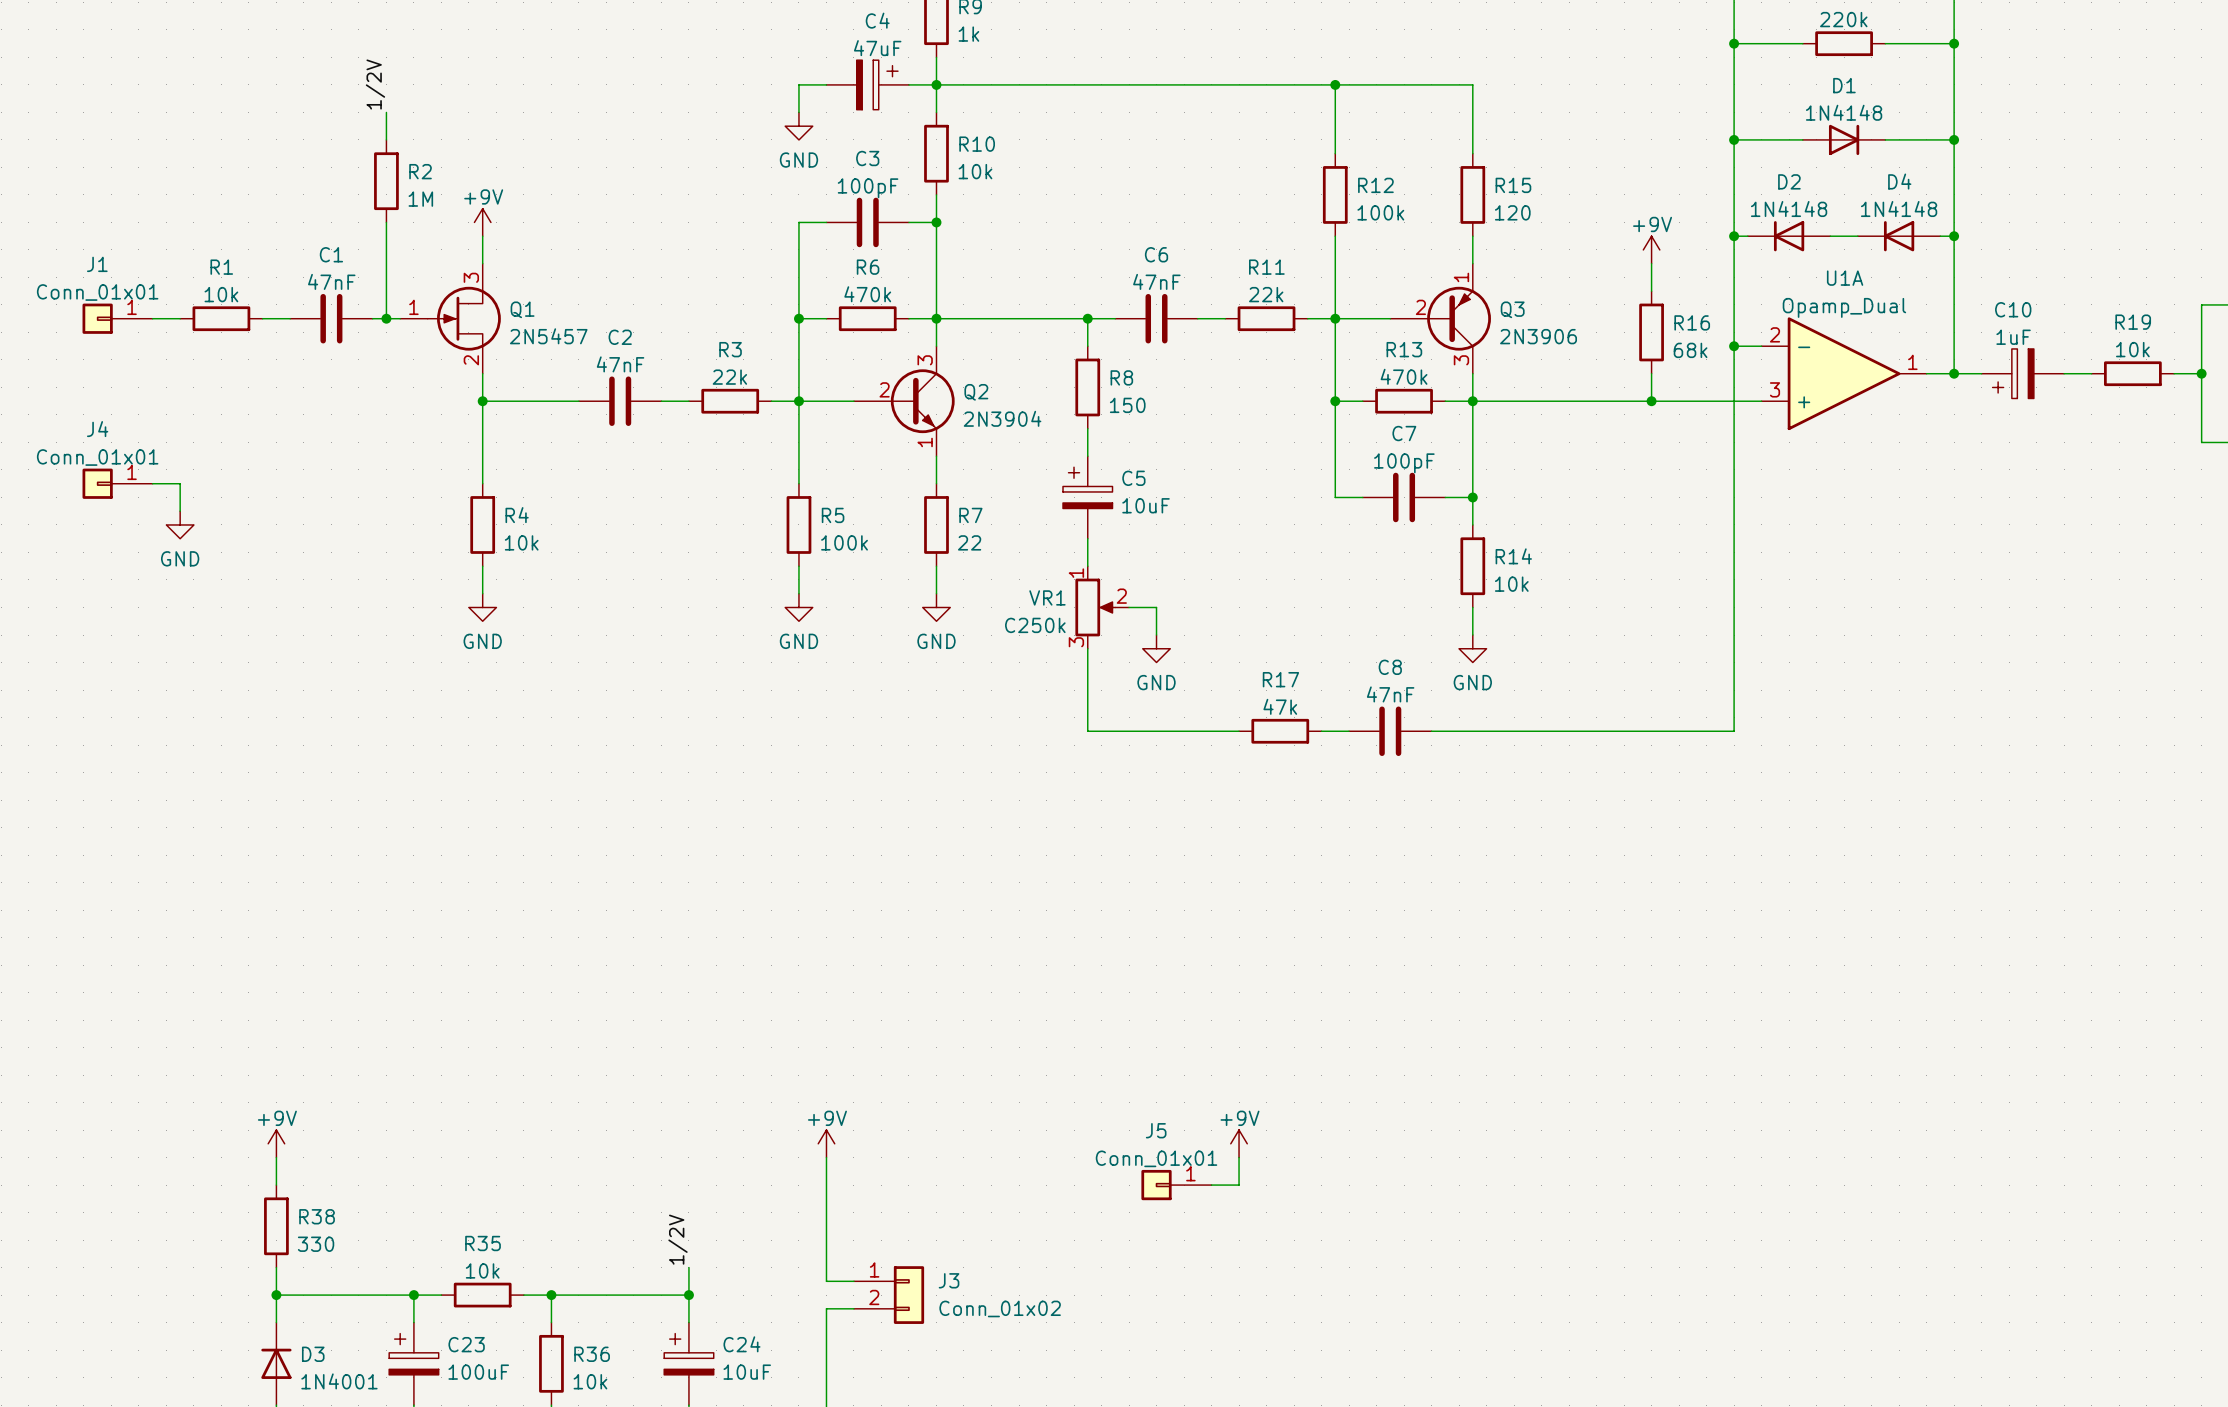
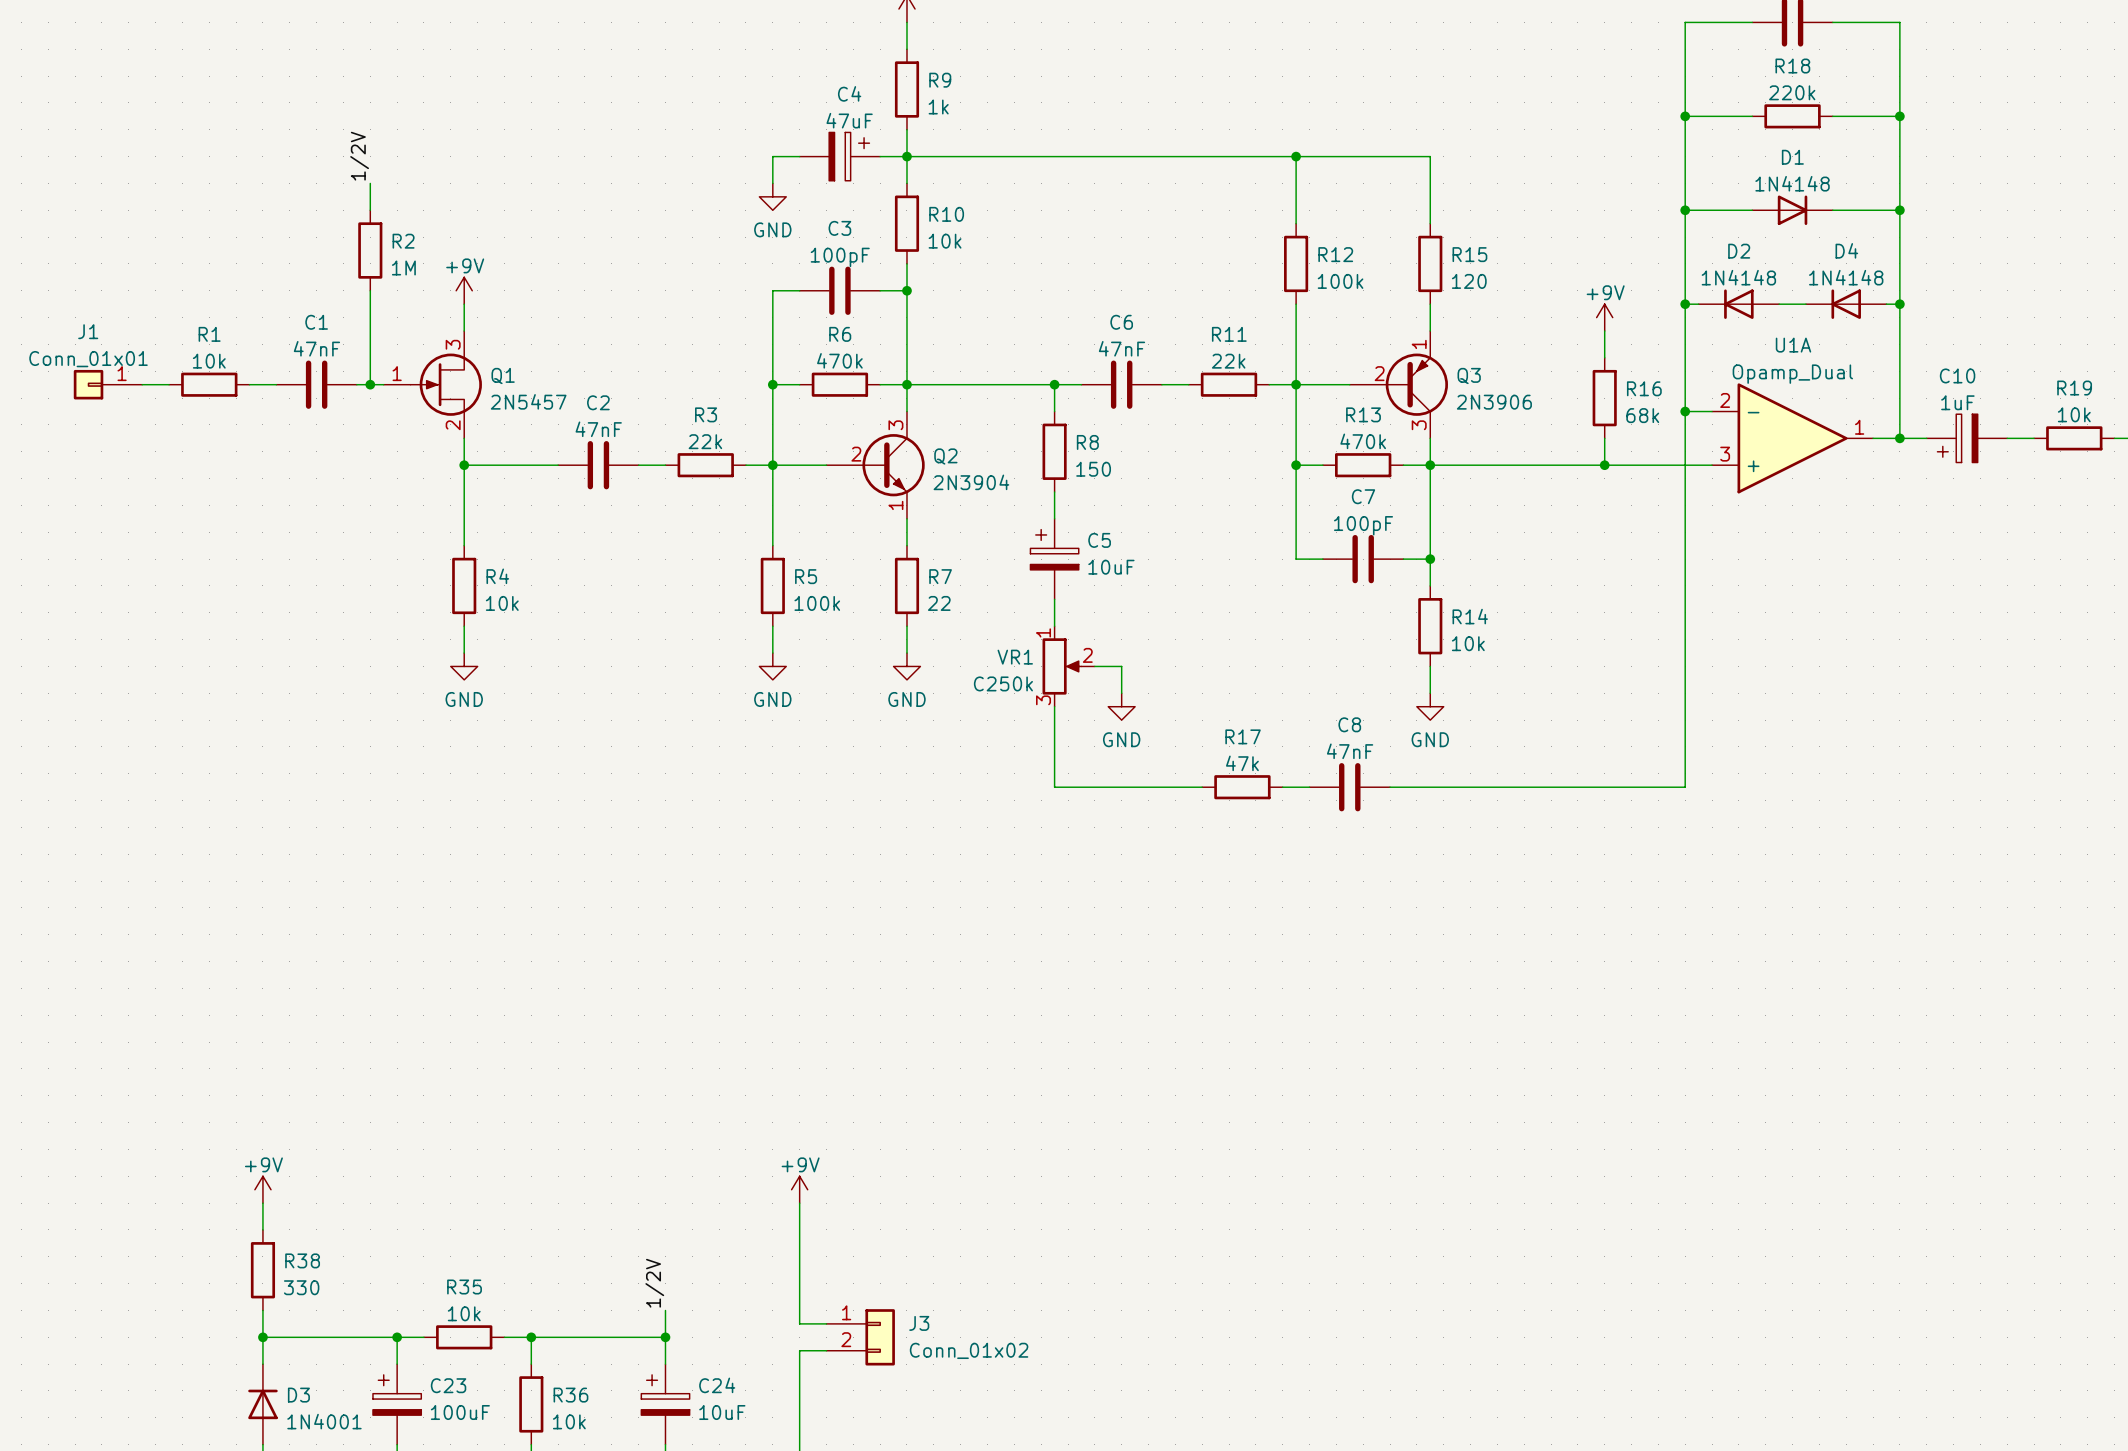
J4: Conn_01x01 (117, 483) -> none
wire: (152, 483) (180, 483) (180, 511) -> none
power symbol: GND (180, 524) -> none
power symbol: +9V (1239, 1143) -> none
wire: (1239, 1157) (1239, 1185) (1211, 1185) -> none
J5: Conn_01x01 (1176, 1185) -> none

